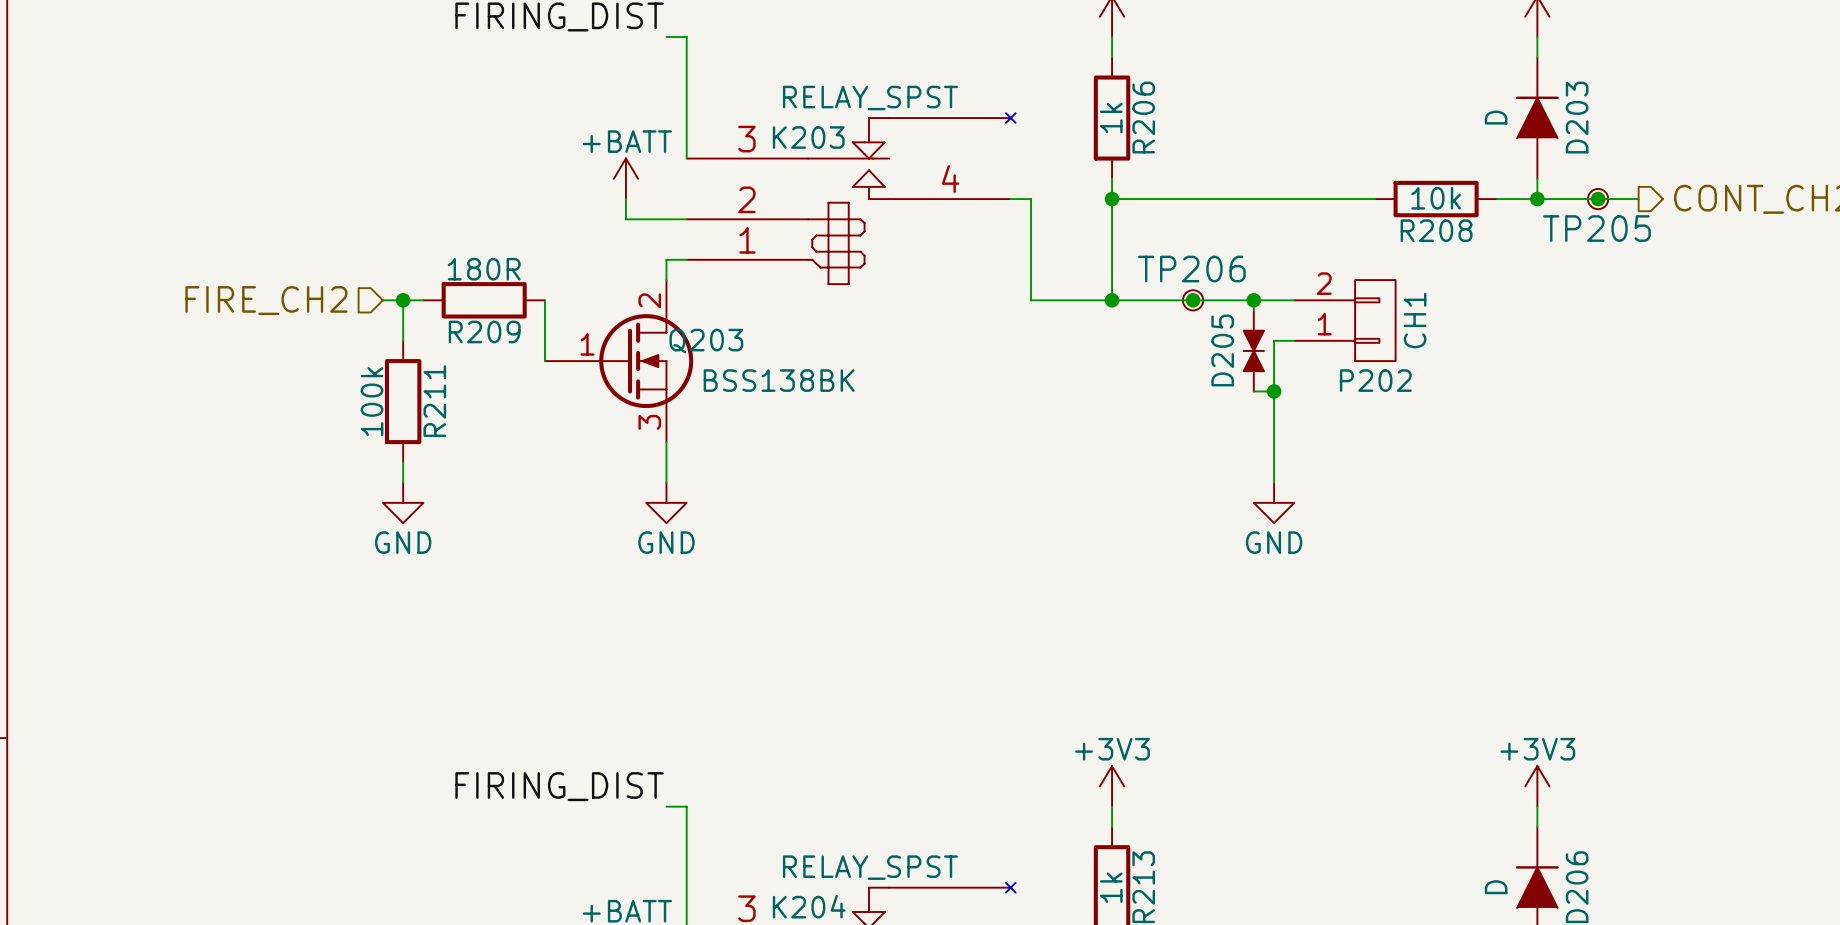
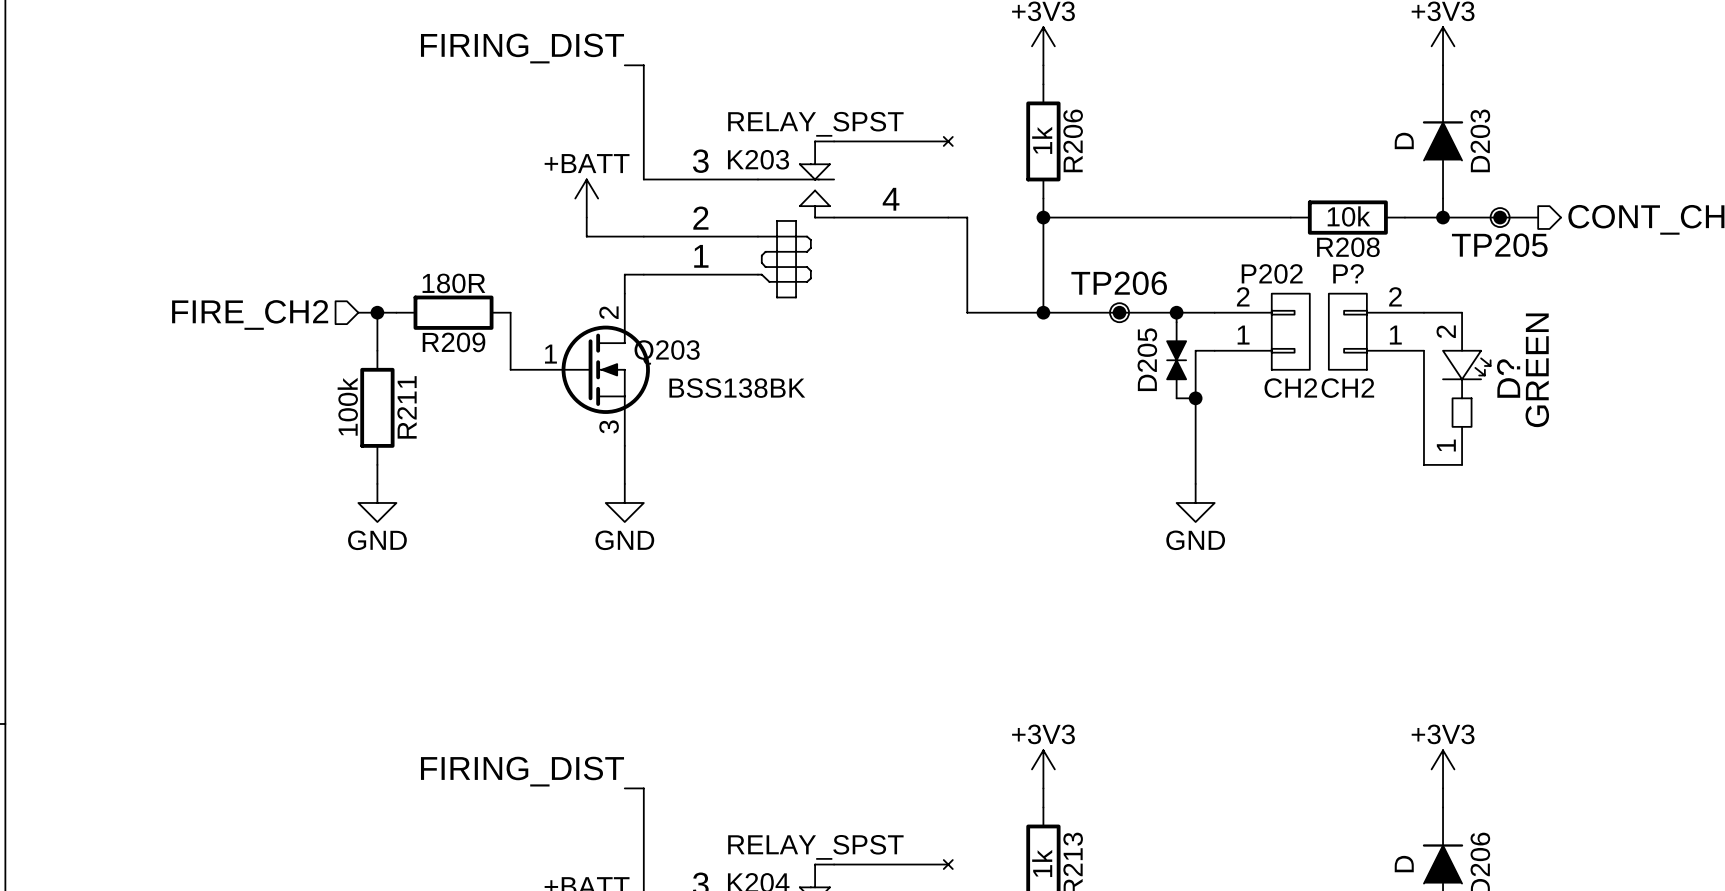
wire: none -> (1423, 312) (1462, 312)
P202 value: CH1 (1415, 320) -> CH2 (1290, 388)
P?: none -> CH2 (1376, 331)
wire: none -> (1423, 350) (1423, 464) (1462, 464)
P202 name position: P202 (1375, 380) -> P202 (1272, 273)
D?: none -> GREEN (1466, 388)

